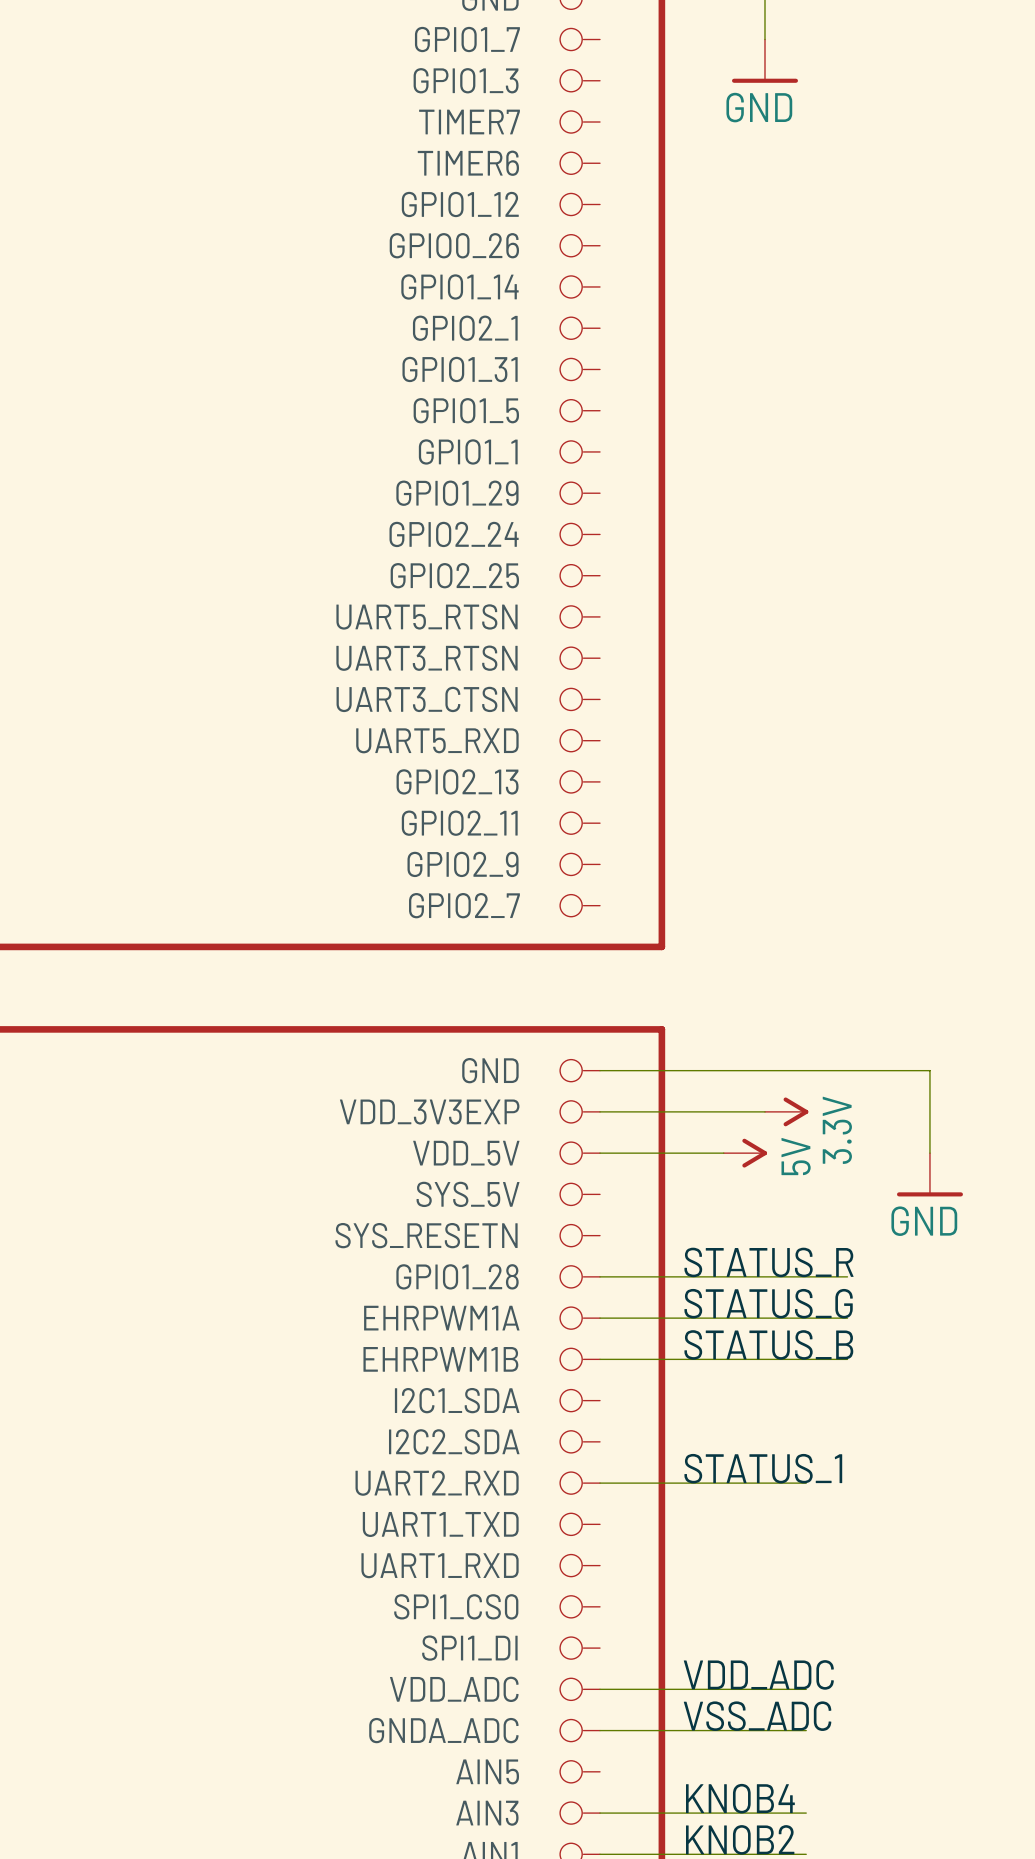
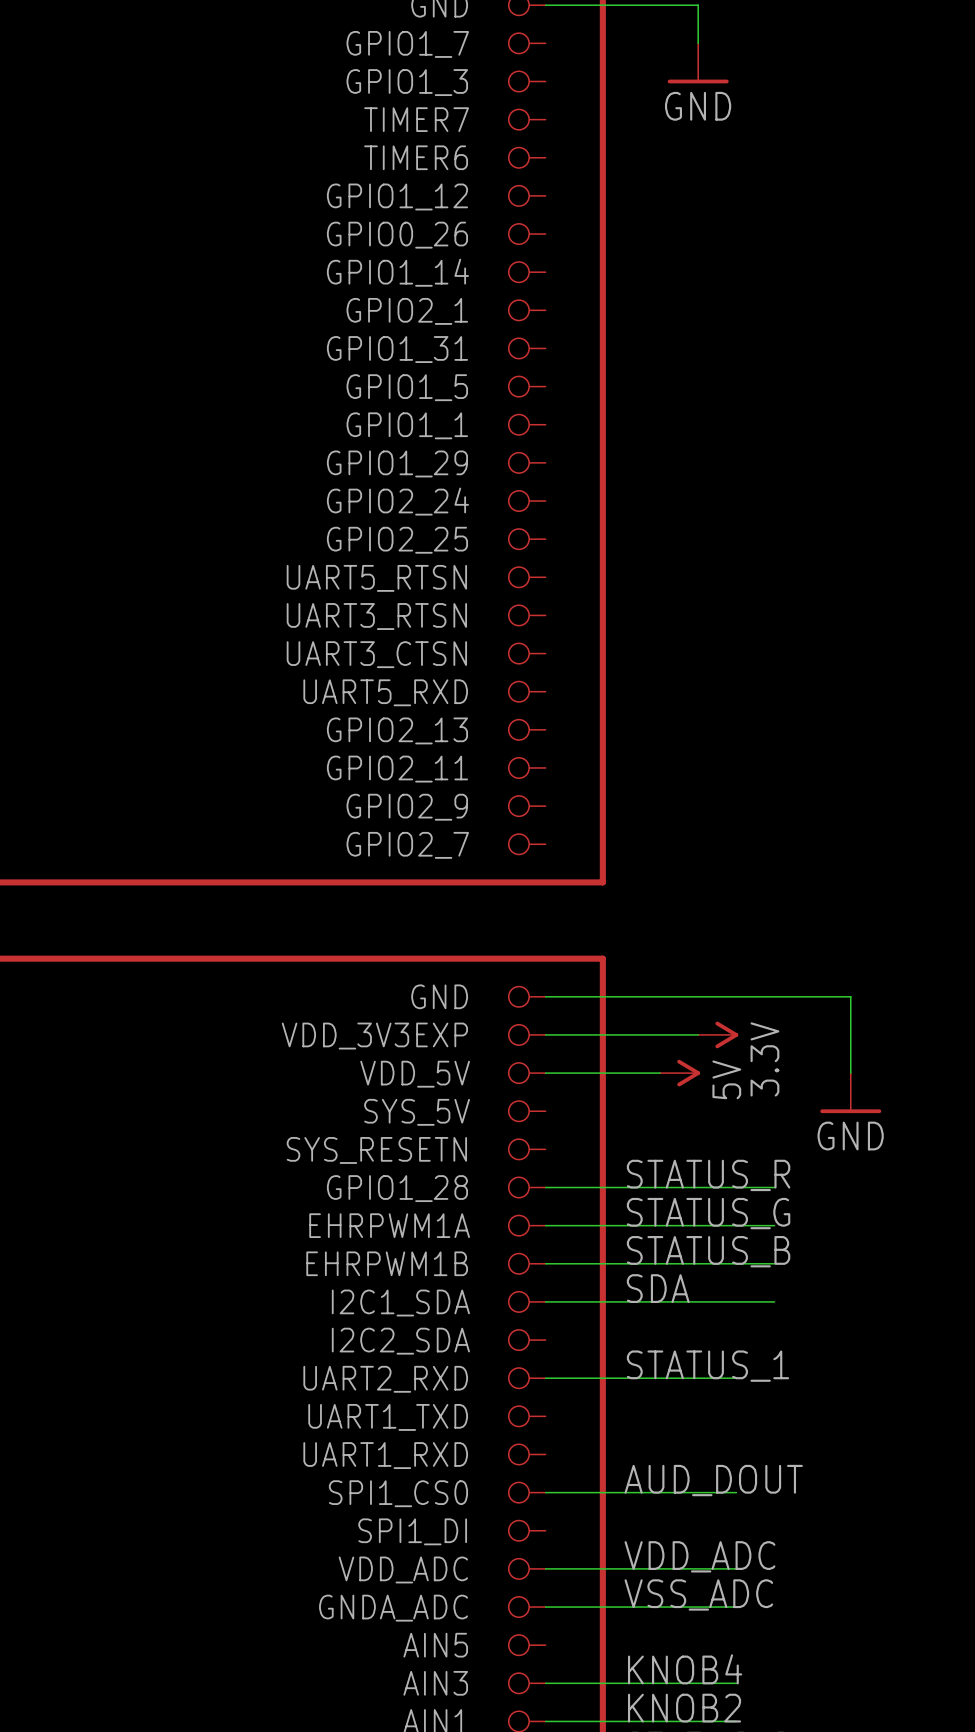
label: none -> SDA (658, 1288)
wire: none -> (545, 1301) (774, 1301)
label: none -> AUD_DOUT (713, 1480)
wire: none -> (545, 1492) (736, 1492)

